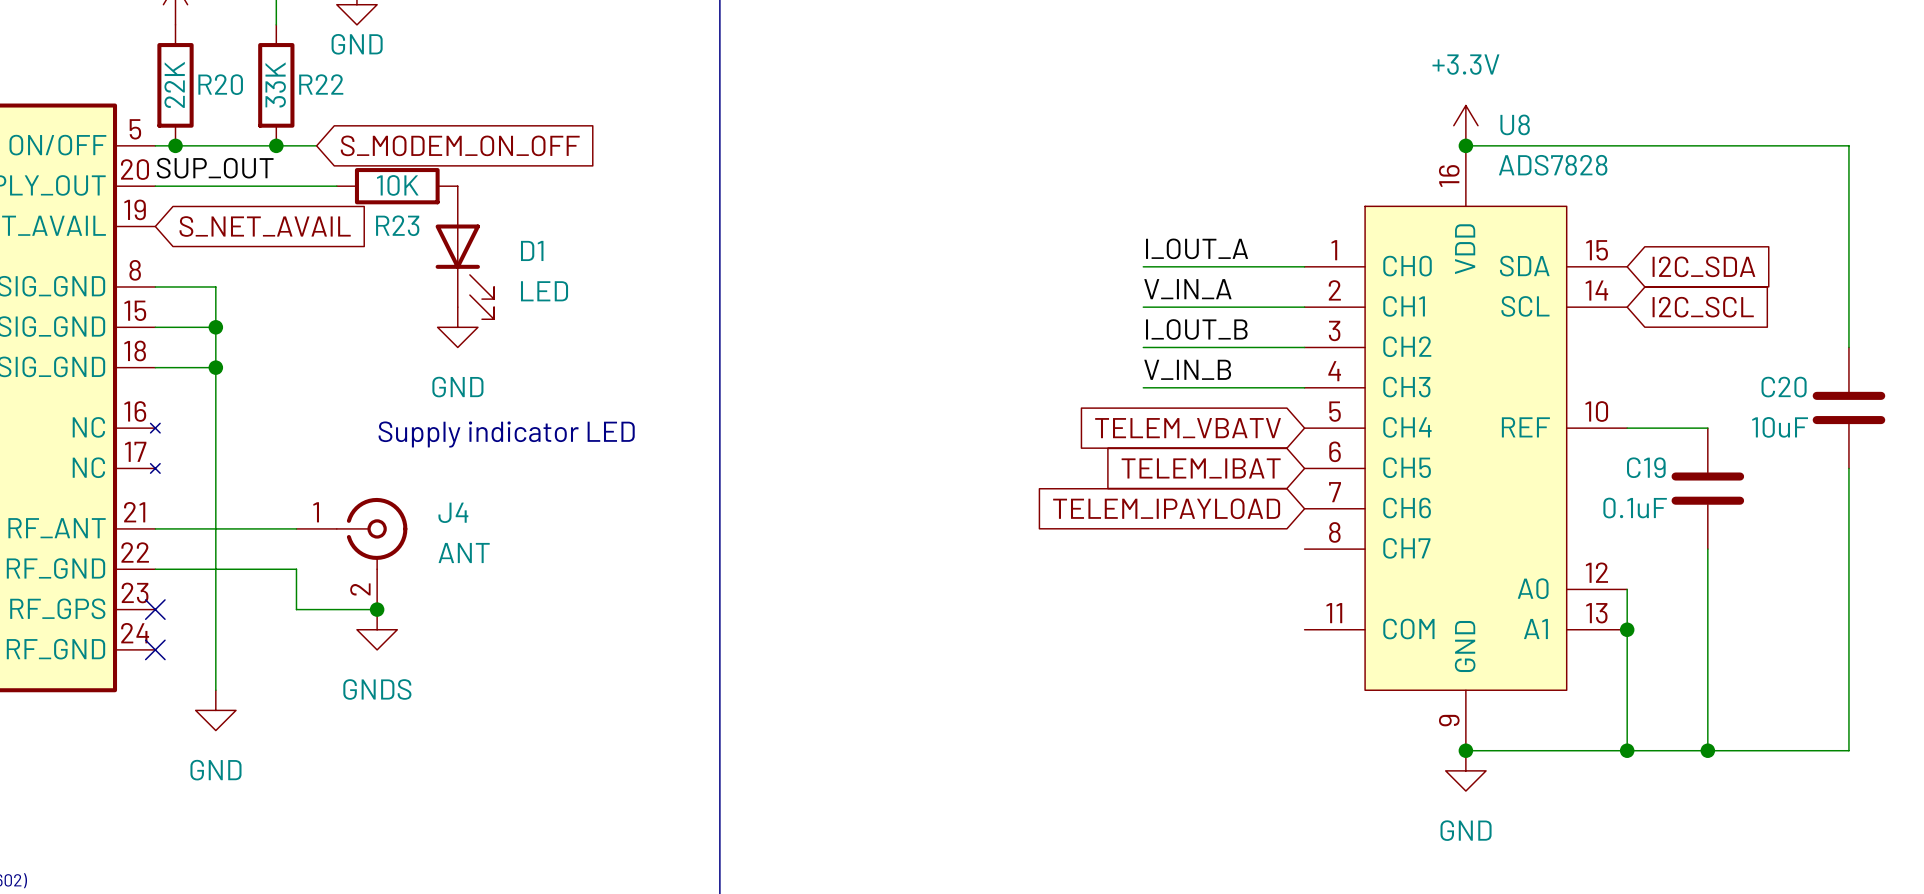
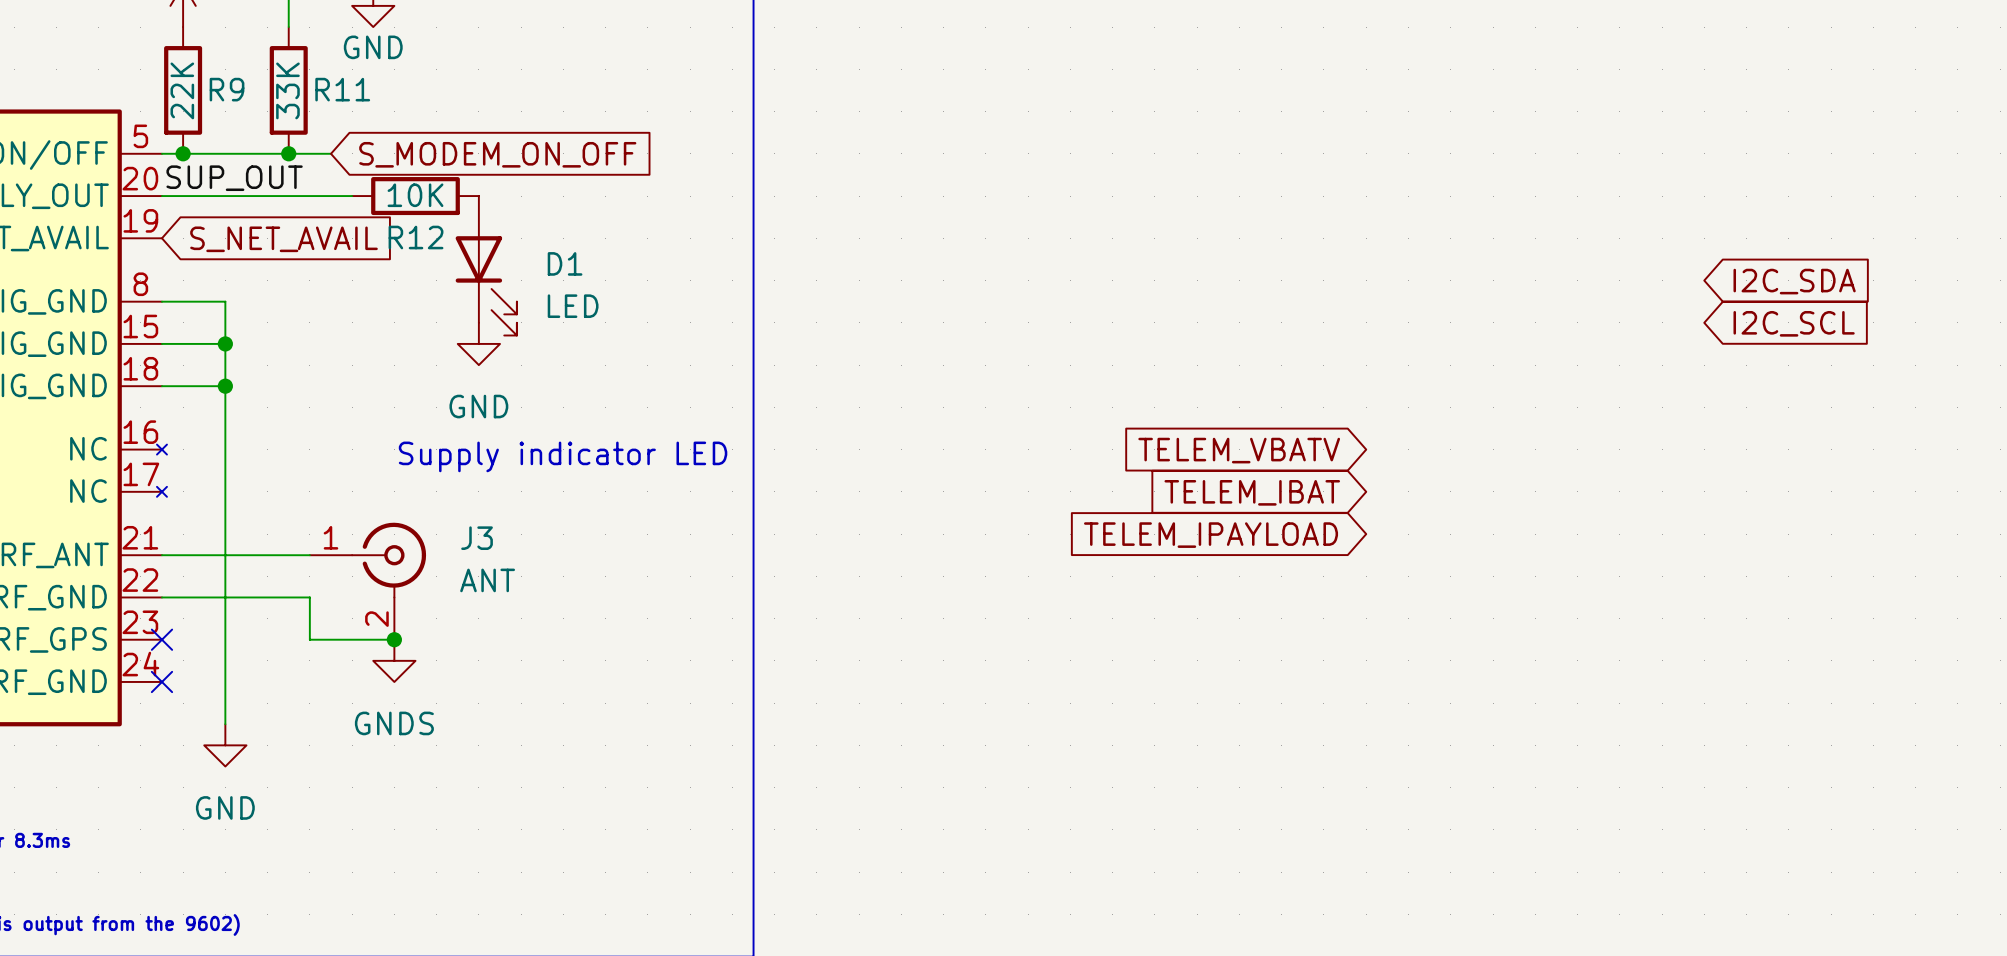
R20 name: R20 (220, 84) -> R9 (227, 89)
R22 name: R22 (321, 84) -> R11 (342, 89)
power symbol: +3.3V (1465, 125) -> none
wire: (1465, 145) (1848, 145) (1848, 347) -> none
junction: (1465, 145) -> none
R23 name: R23 (397, 225) -> R12 (416, 237)
label: I_OUT_A (1197, 248) -> none
wire: (1143, 266) (1304, 266) -> none
label: V_IN_A (1187, 289) -> none
wire: (1143, 307) (1304, 307) -> none
label: I_OUT_B (1196, 329) -> none
wire: (1143, 347) (1304, 347) -> none
label: V_IN_B (1187, 369) -> none
wire: (1143, 387) (1304, 387) -> none
C20: 10uF (1848, 407) -> none
wire: (1627, 428) (1707, 428) -> none
U8: ADS7828 (1465, 448) -> none
wire: (1848, 468) (1848, 750) (1465, 750) -> none
C19: 0.1uF (1707, 488) -> none
J4 name: J4 (453, 512) -> J3 (477, 538)
wire: (1707, 549) (1707, 750) -> none
wire: (1627, 589) (1627, 750) -> none
junction: (1627, 629) -> none
junction: (1465, 750) -> none
junction: (1627, 750) -> none
junction: (1707, 750) -> none
power symbol: GND (1465, 770) -> none

